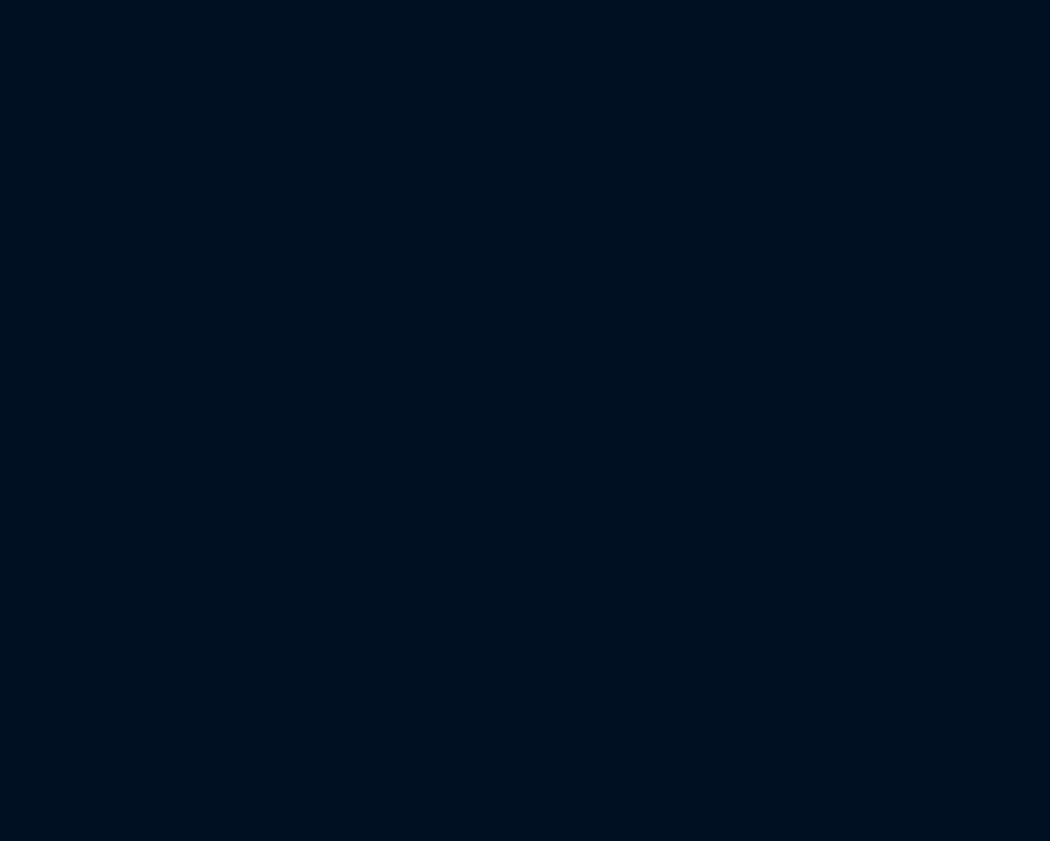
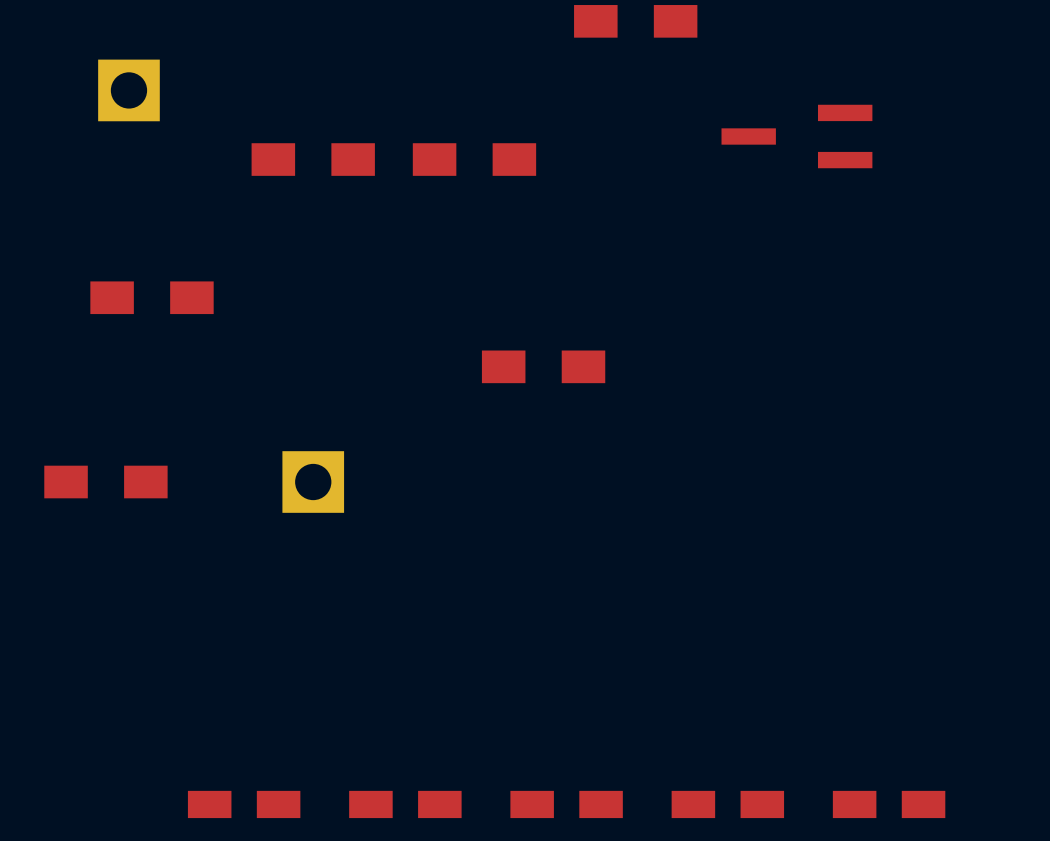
part: none -> (635, 21)
part: none -> (128, 90)
part: none -> (796, 136)
part: none -> (313, 159)
part: none -> (474, 159)
part: none -> (152, 297)
part: none -> (543, 366)
part: none -> (105, 482)
part: none -> (313, 482)
part: none -> (244, 804)
part: none -> (405, 804)
part: none -> (566, 804)
part: none -> (727, 804)
part: none -> (889, 804)

